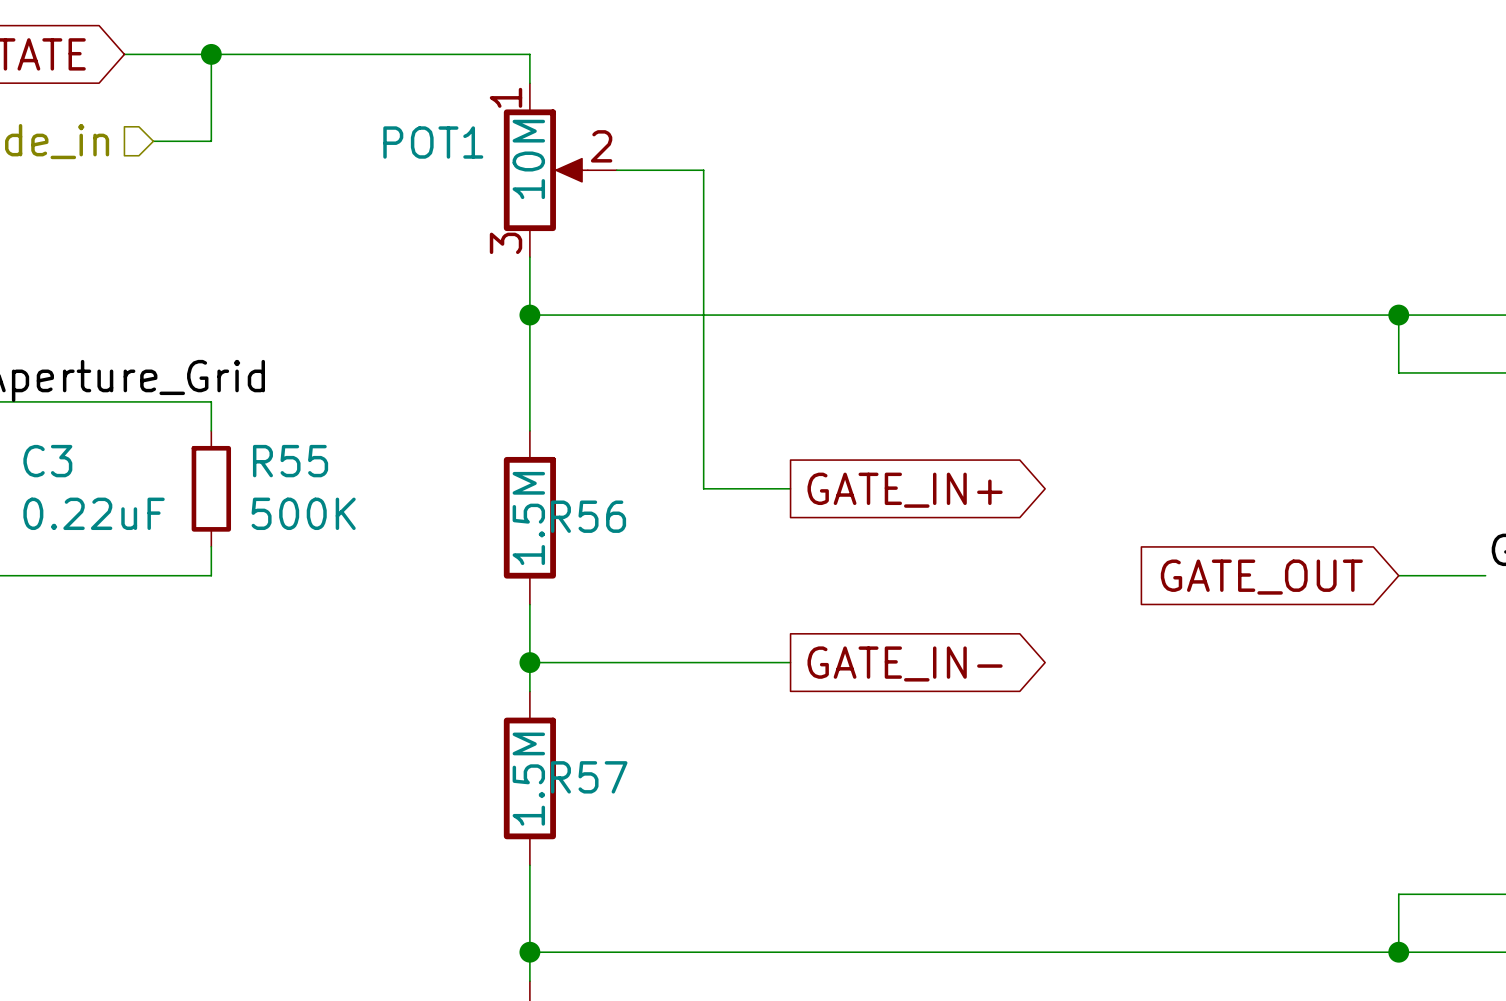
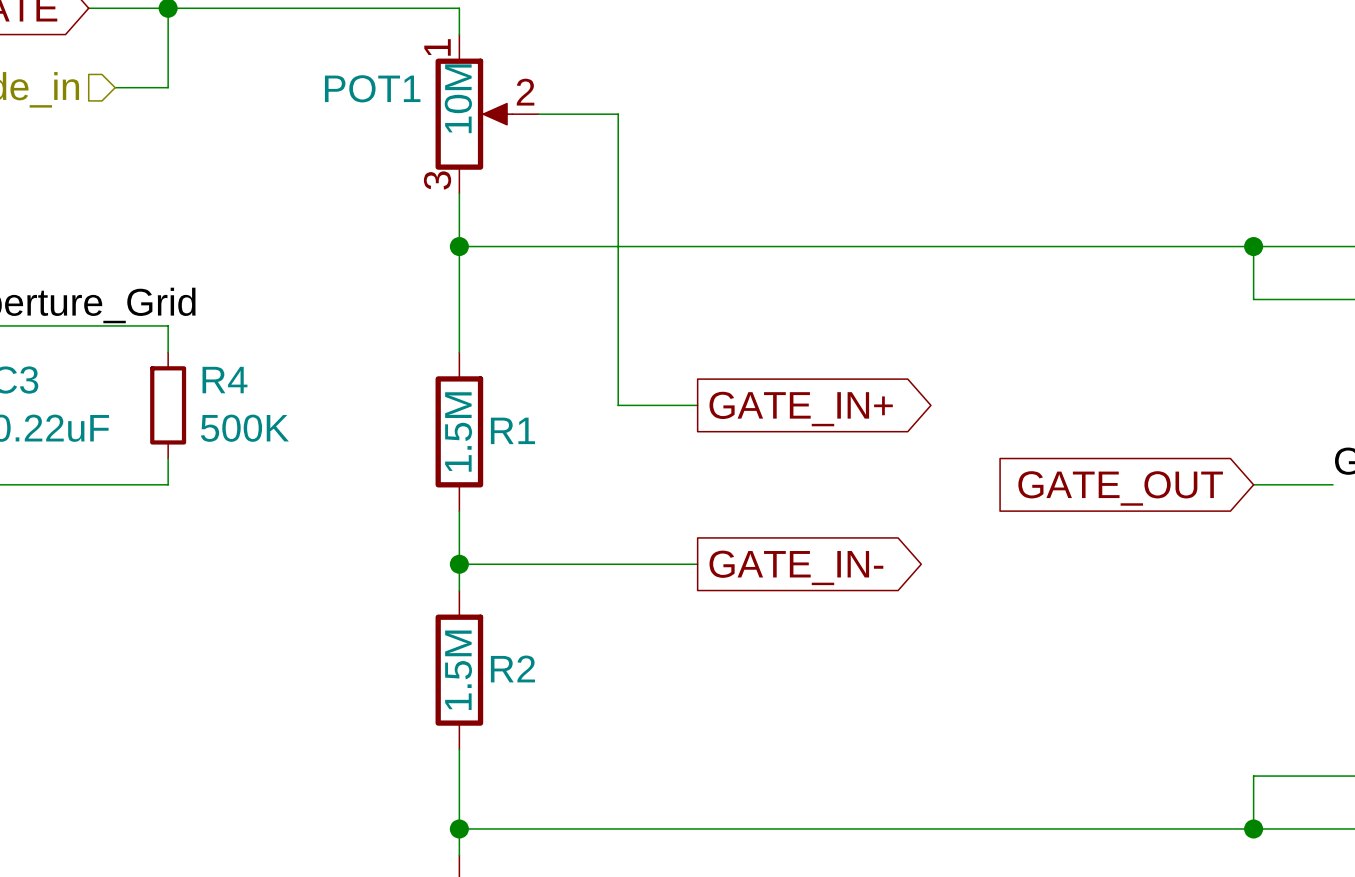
R55 name: R55 (290, 461) -> R4 (224, 380)
R56 name: R56 (588, 516) -> R1 (512, 430)
R57 name: R57 (589, 777) -> R2 (512, 668)

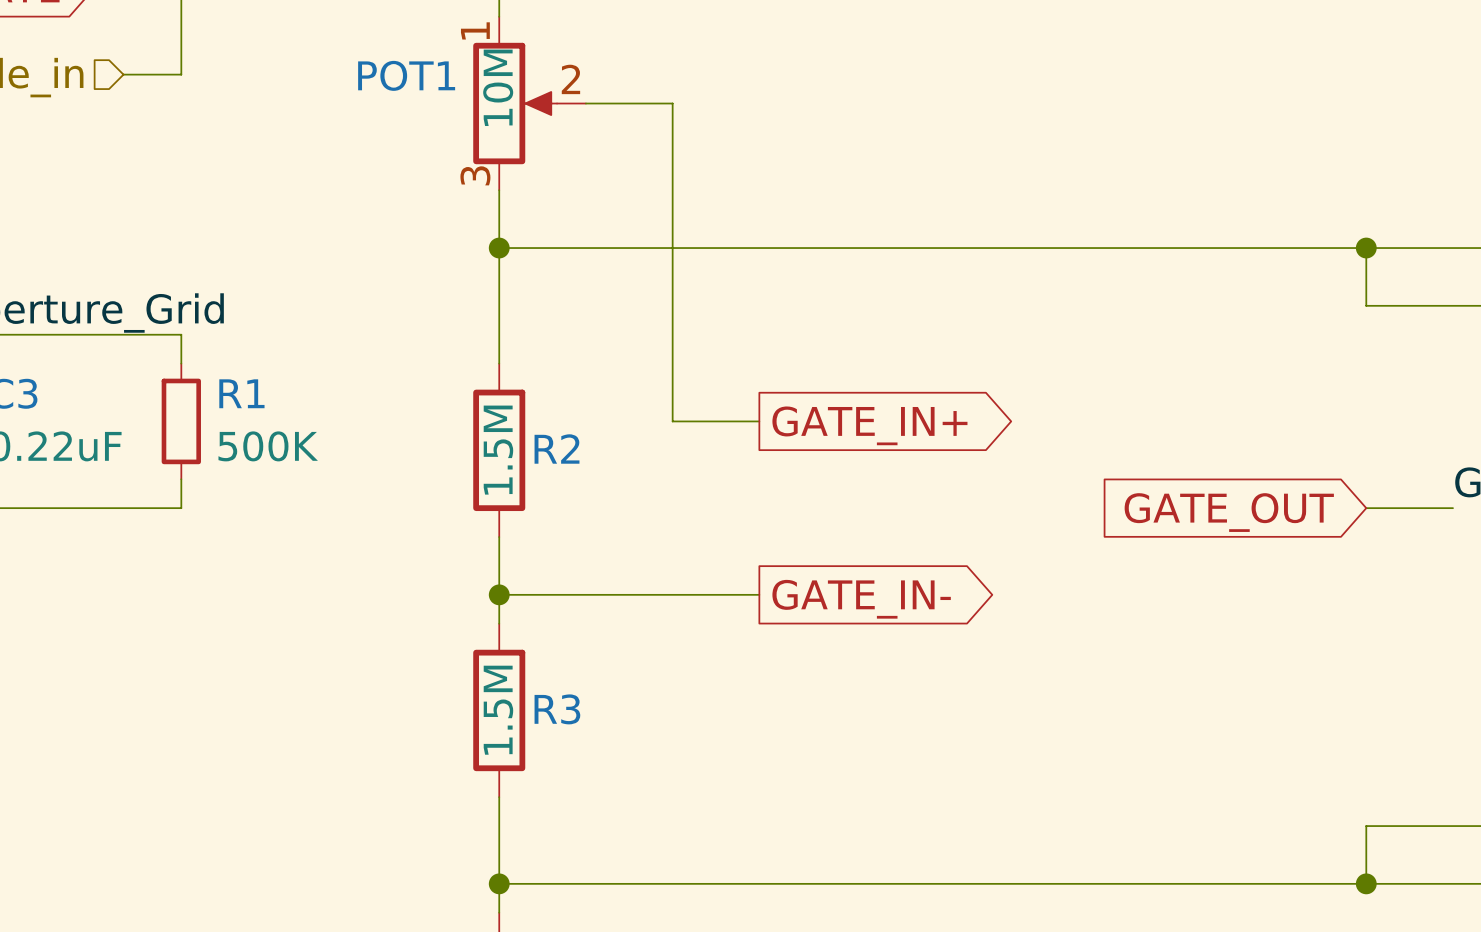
R4 name: R4 (224, 380) -> R1 (241, 393)
R1 name: R1 (512, 430) -> R2 (557, 448)
R2 name: R2 (512, 668) -> R3 (557, 709)

